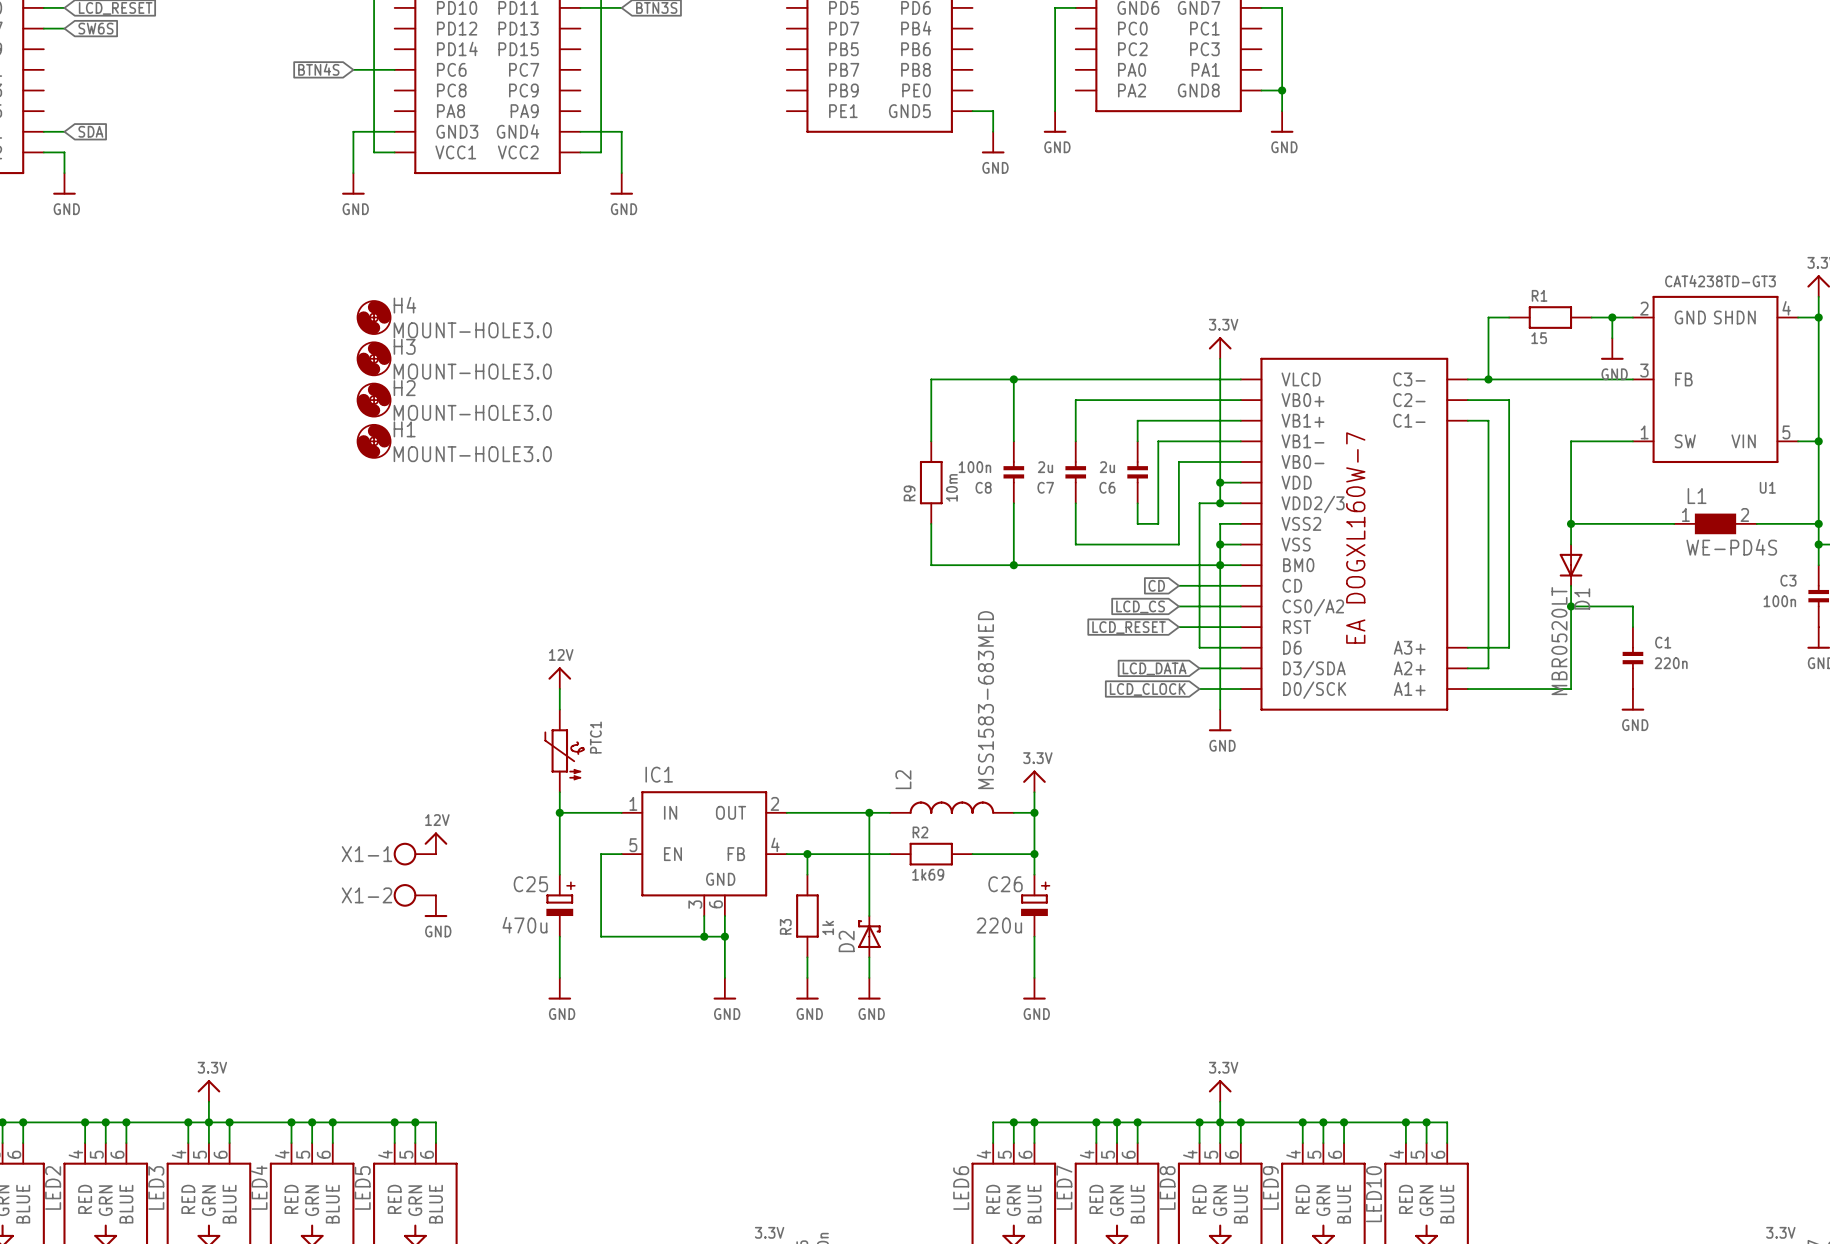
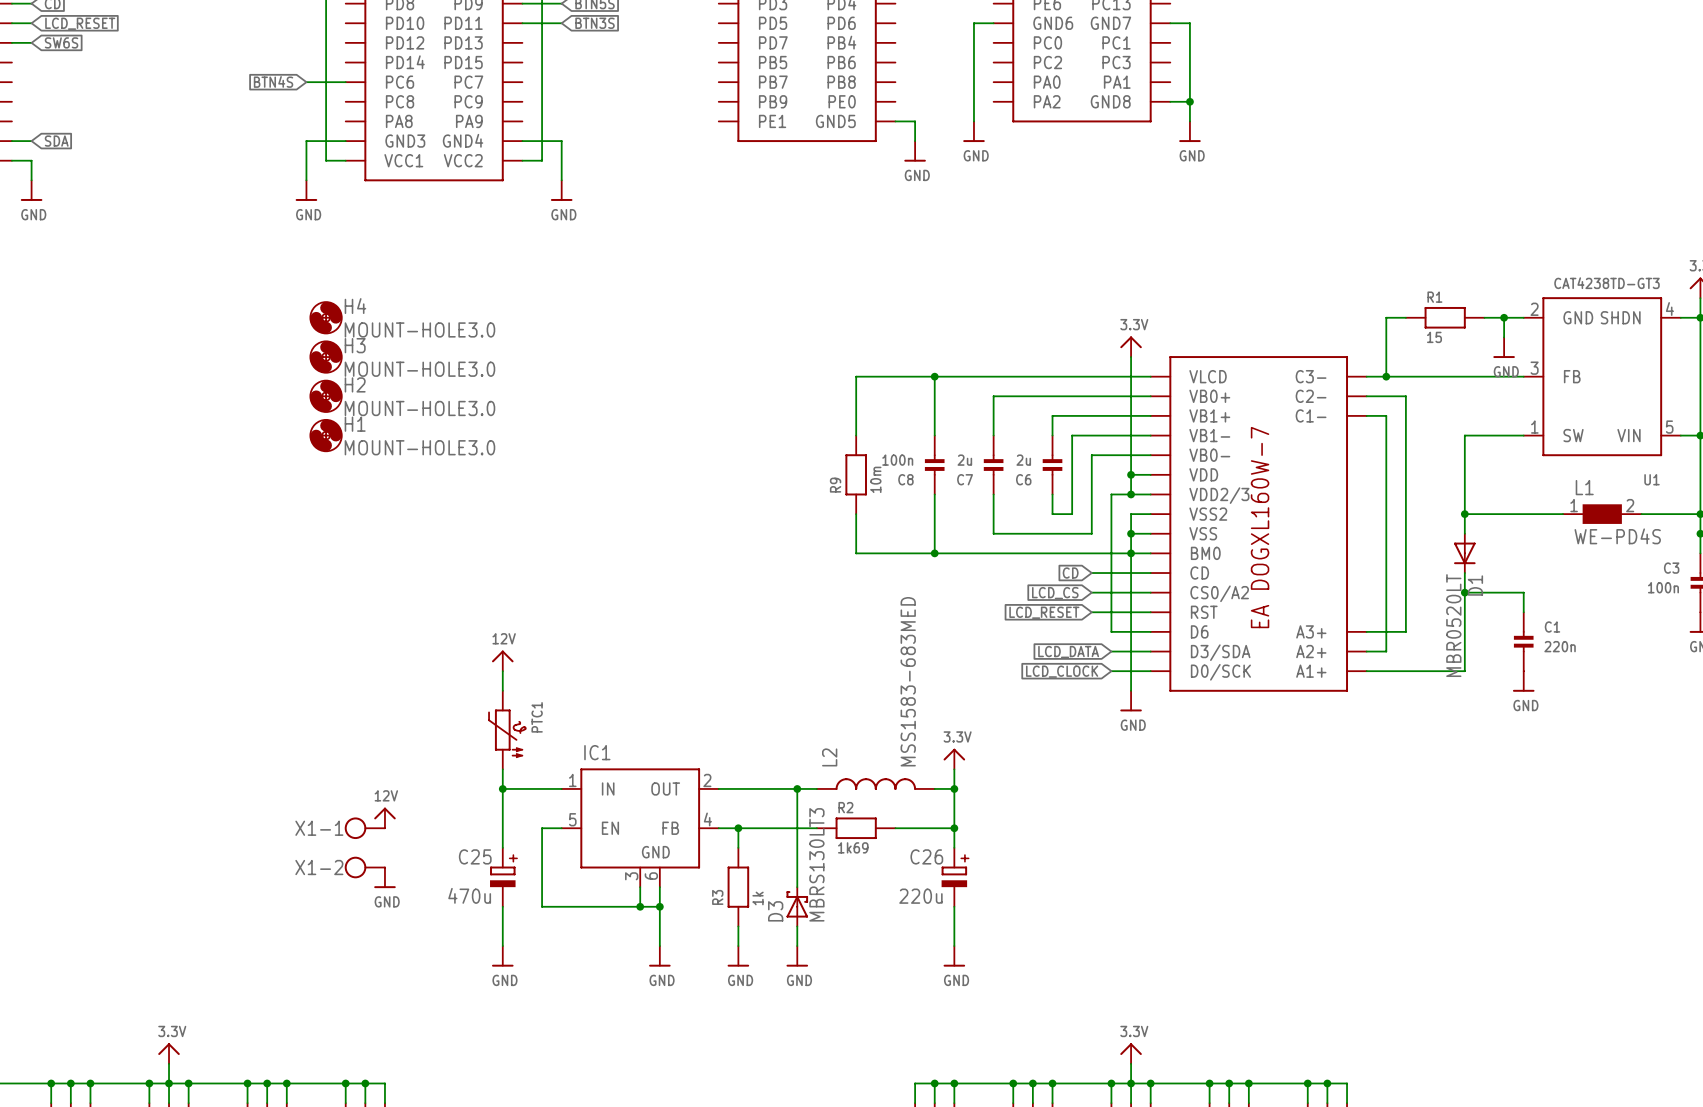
D2 value: none -> MBRS130LT3 (816, 864)
D2 name: D2 (846, 941) -> D3 (775, 911)

